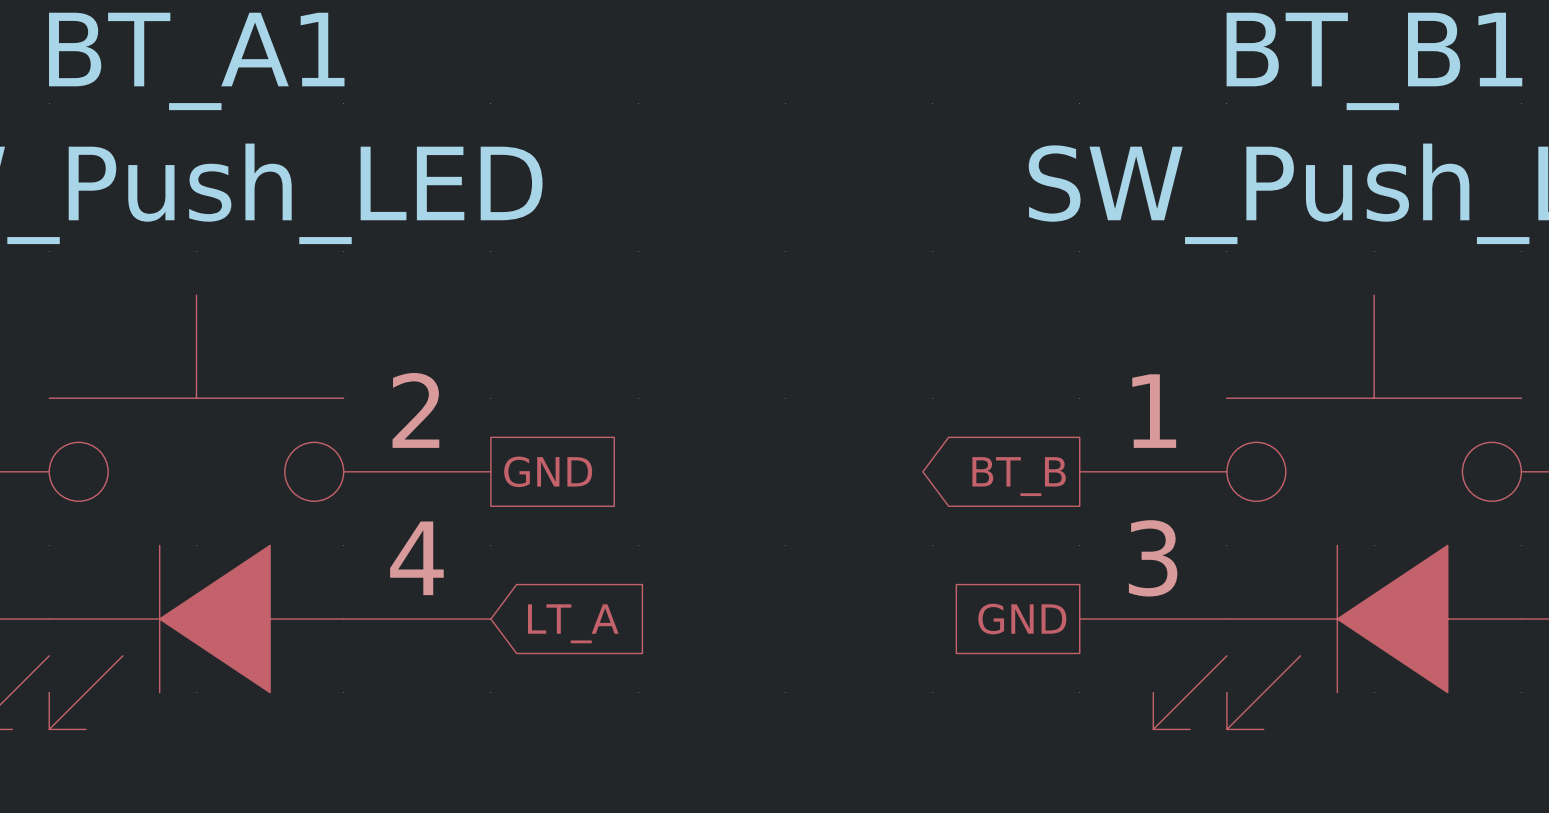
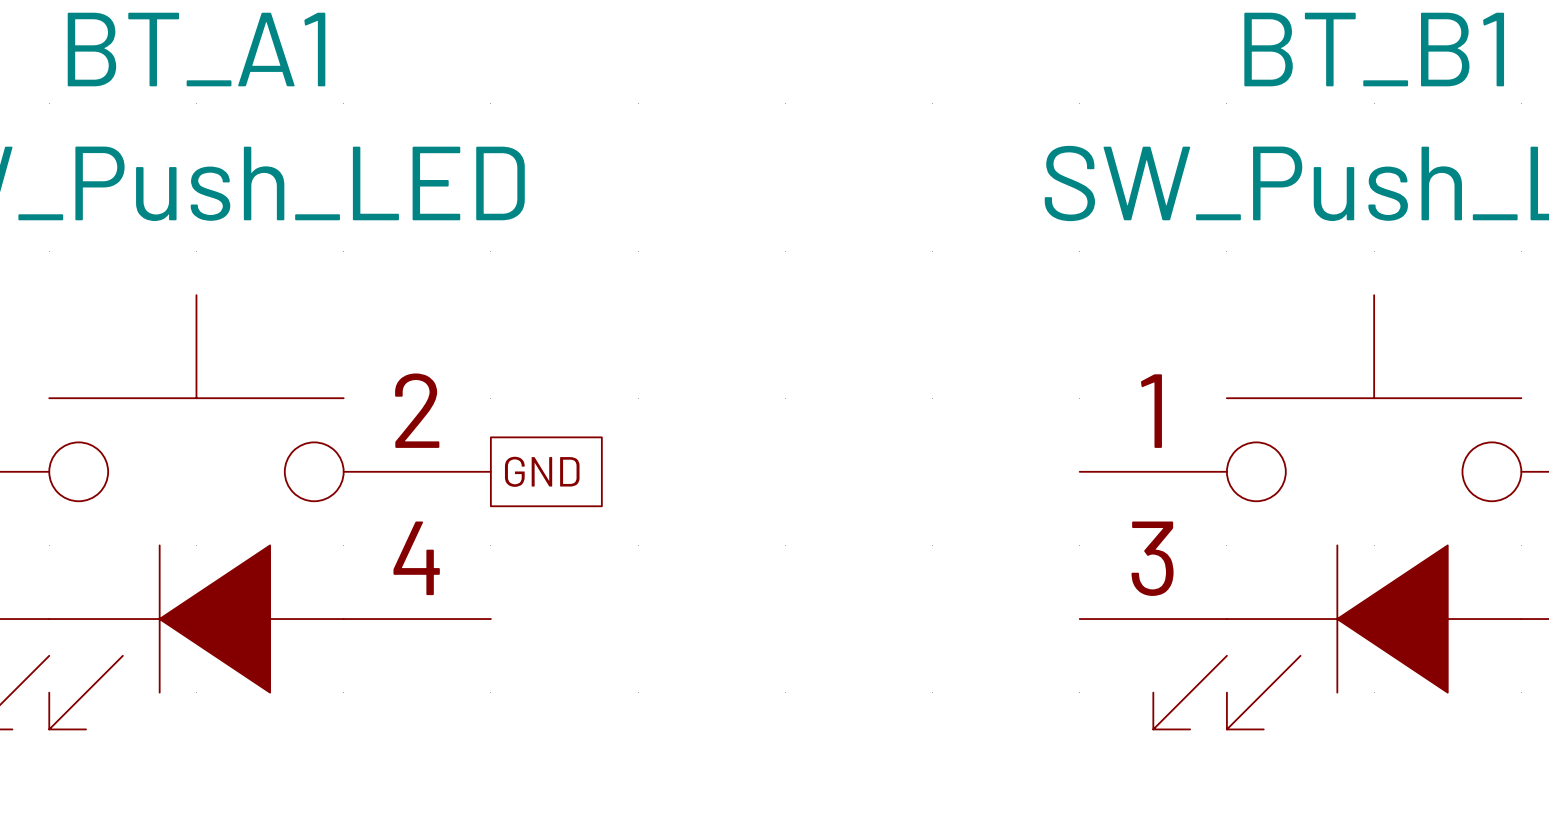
global label: BT_B (1019, 476) -> none
global label: GND (1022, 619) -> none
global label: LT_A (573, 623) -> none

